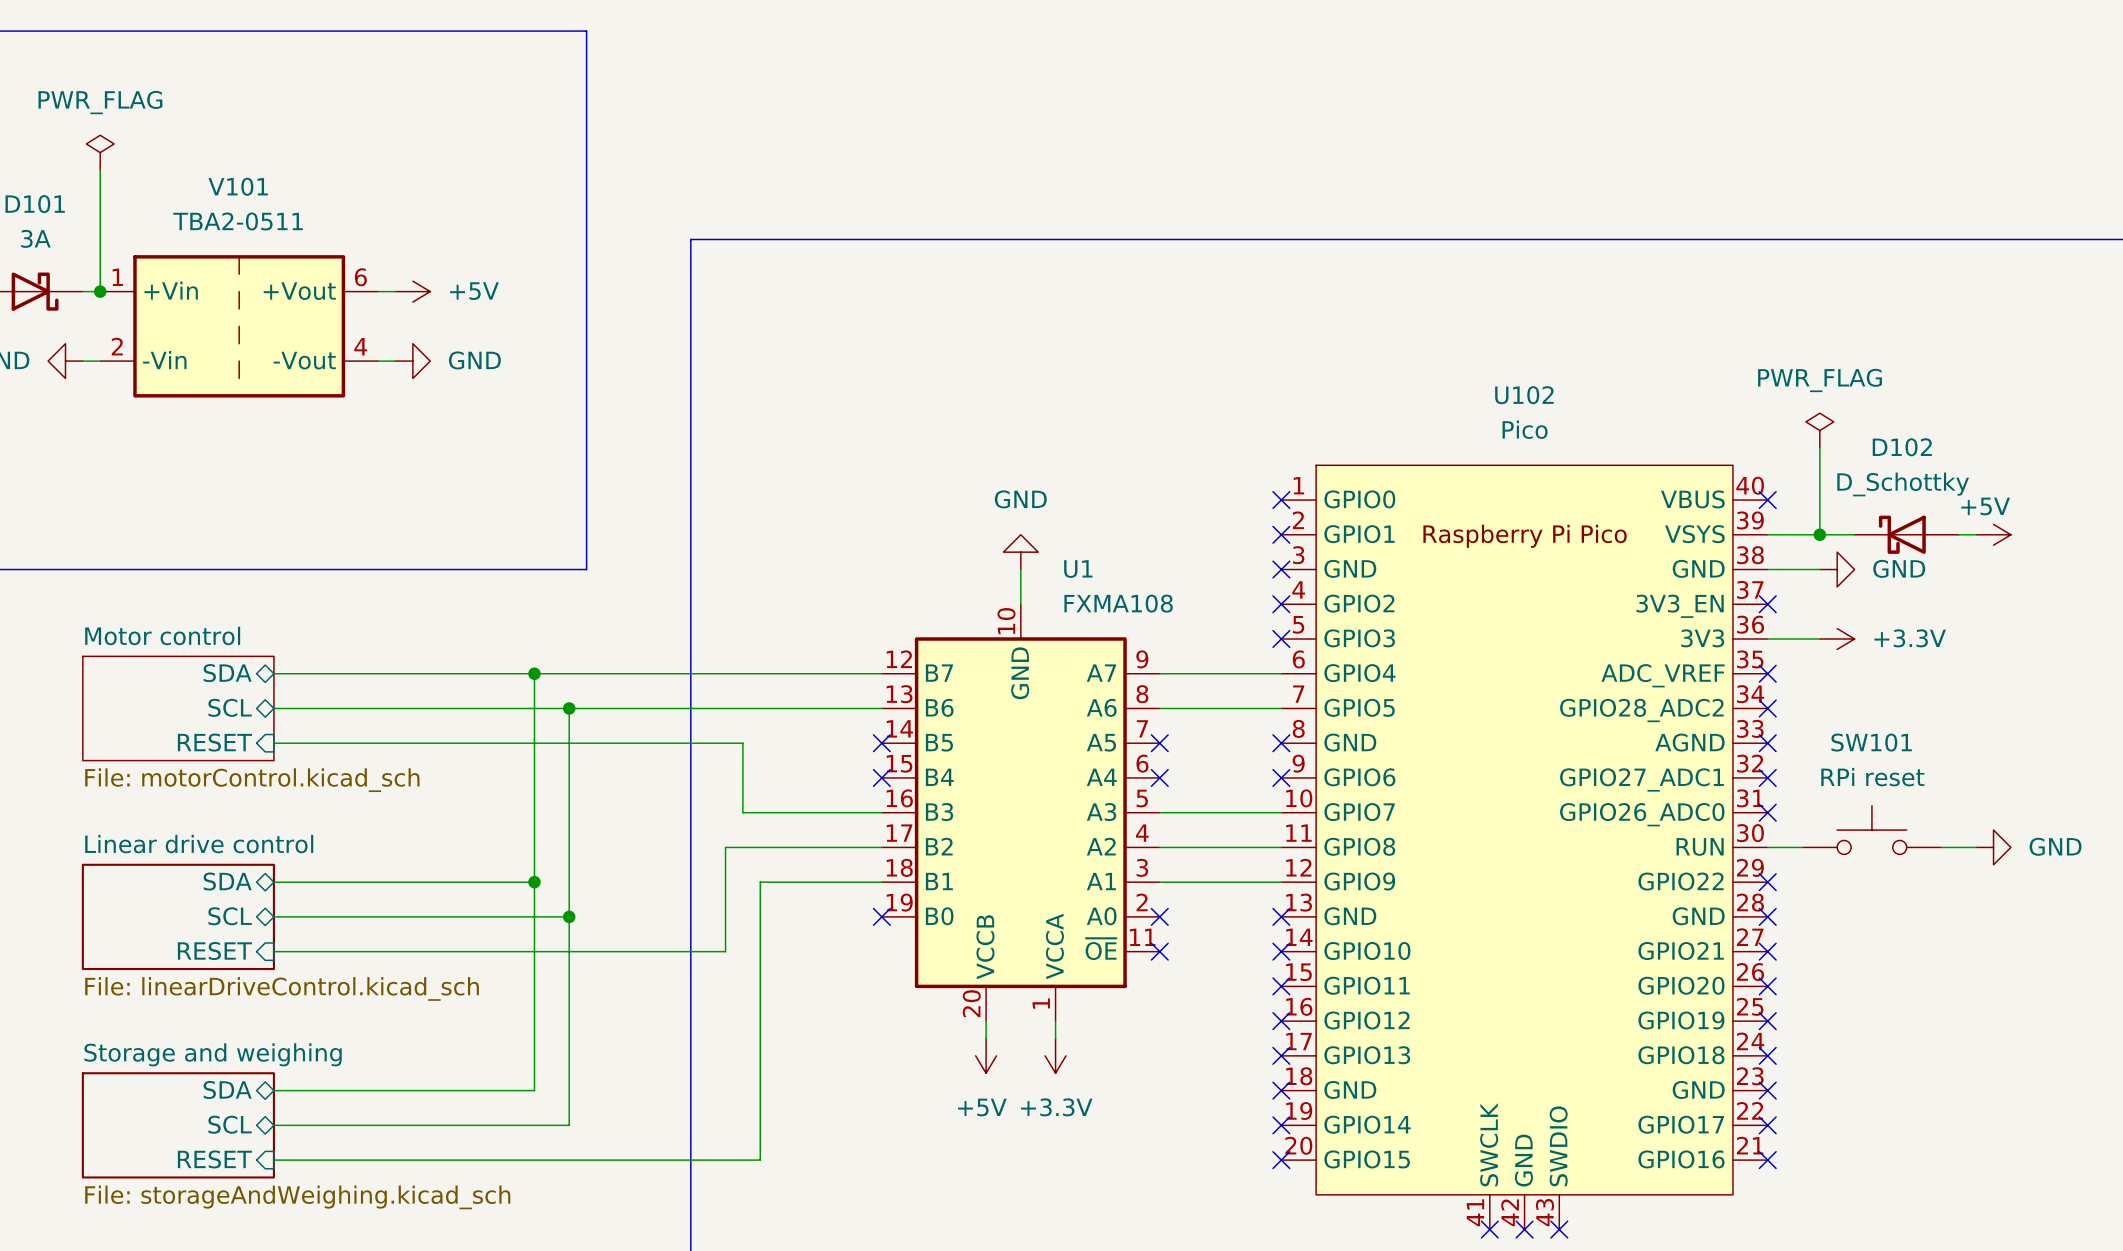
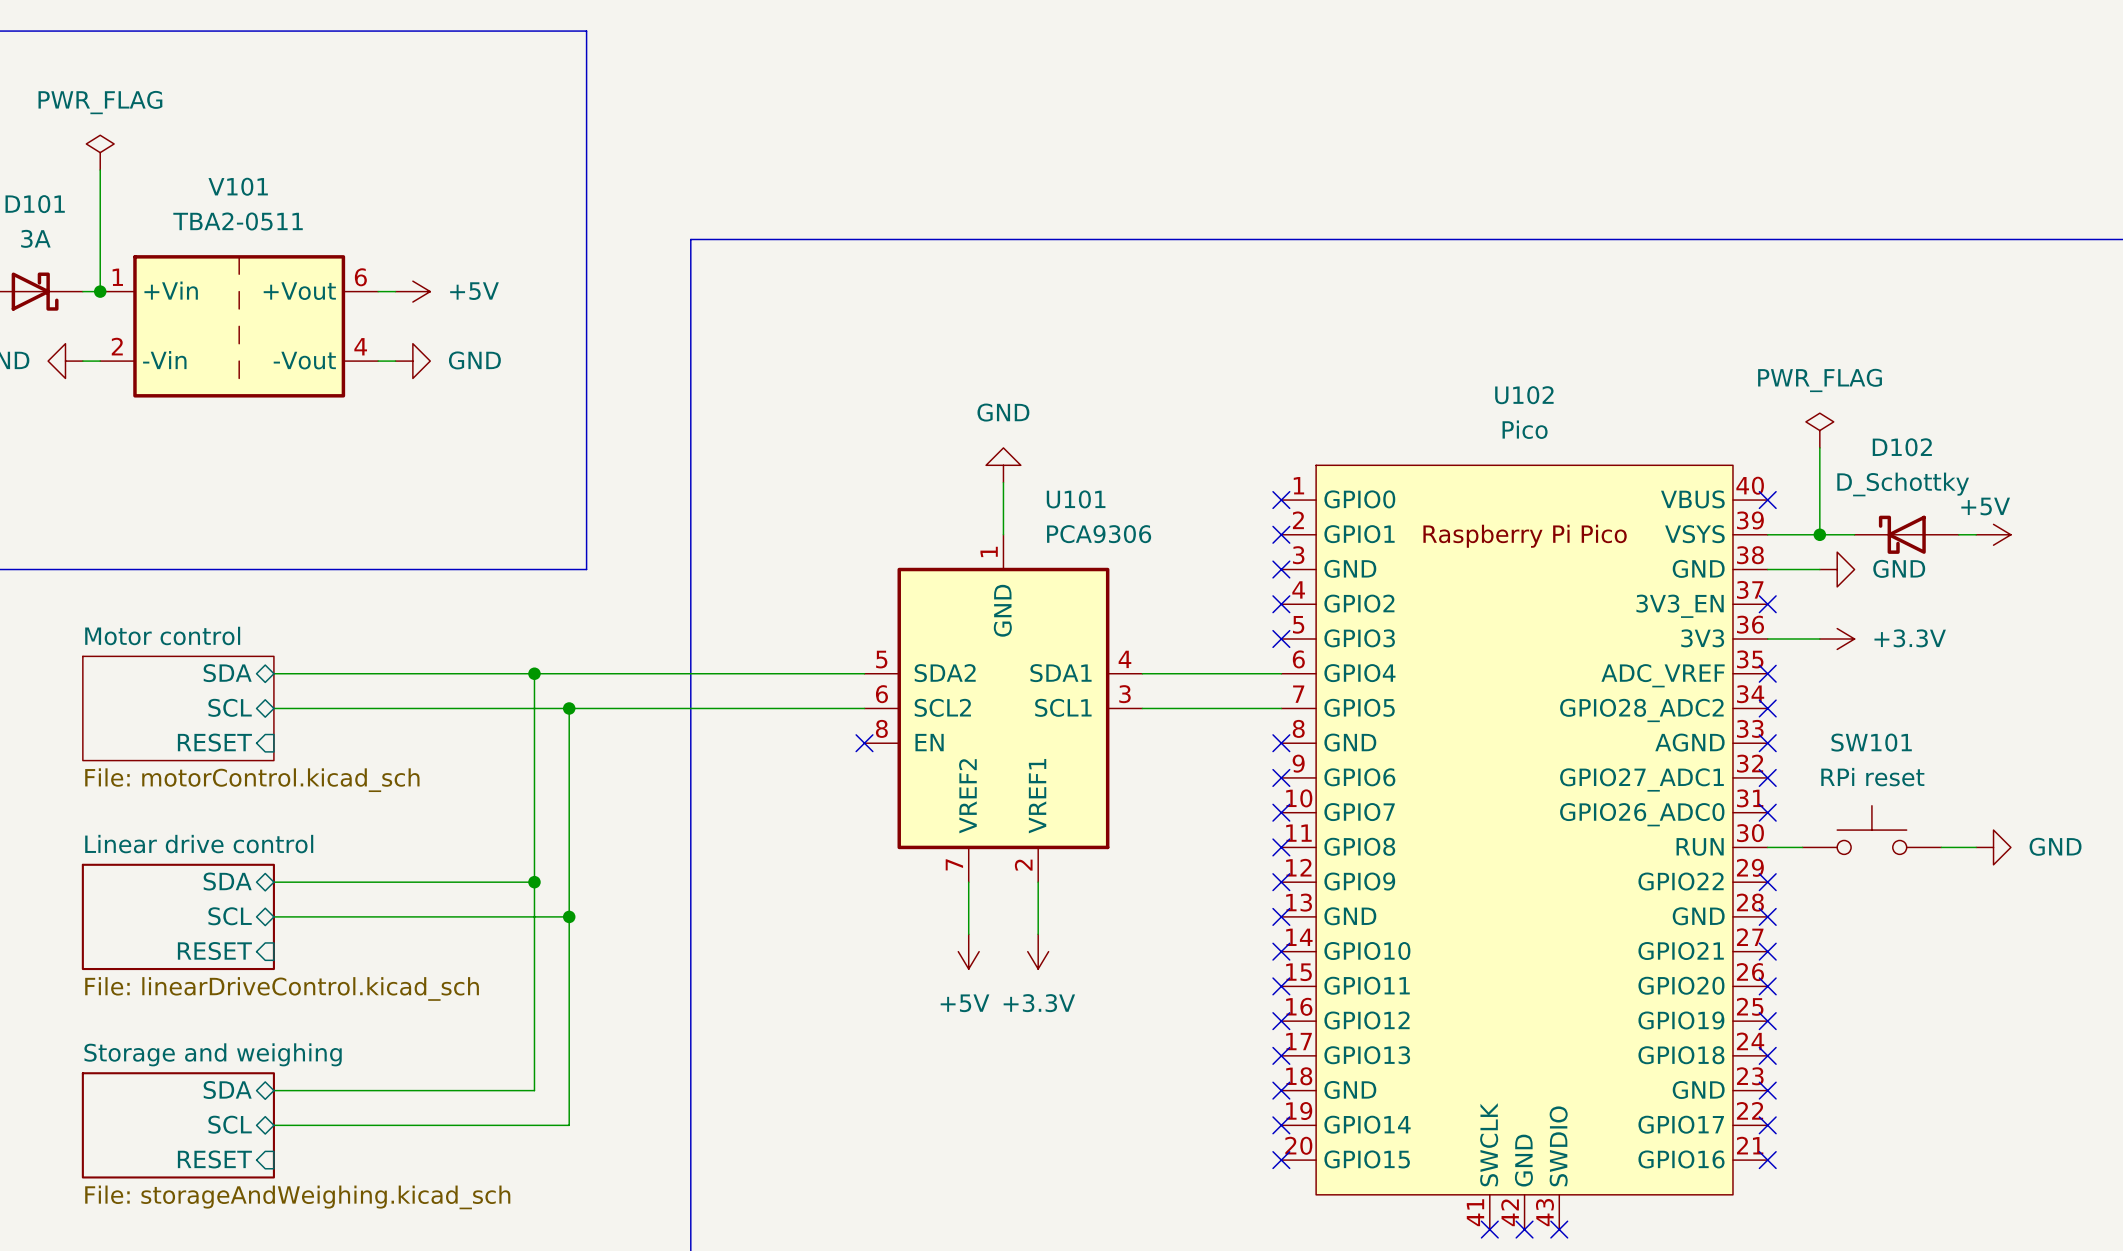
wire: none -> (1003, 482) (1003, 534)
power symbol position: GND (1020, 552) -> GND (1003, 465)
U101: none -> PCA9306 (1003, 708)
wire: (273, 743) (742, 743) (742, 812) (881, 812) -> none
no-connect mark position: (881, 743) -> (864, 743)
no-connect mark: (1159, 743) -> none
no-connect mark: (881, 777) -> none
no-connect mark: (1159, 777) -> none
U1: FXMA108 (1020, 812) -> none
wire: (1159, 812) (1281, 812) -> none
no-connect mark: none -> (1281, 812)
wire: (881, 847) (725, 847) (725, 951) (273, 951) -> none
wire: (1159, 847) (1281, 847) -> none
no-connect mark: none -> (1281, 847)
wire: (881, 882) (760, 882) (760, 1160) (273, 1160) -> none
wire: (1159, 882) (1281, 882) -> none
no-connect mark: none -> (1281, 882)
no-connect mark: (881, 916) -> none
no-connect mark: (1159, 916) -> none
no-connect mark: (1159, 951) -> none
wire: (986, 1021) (986, 1038) -> none
wire: (1055, 1021) (1055, 1038) -> none
power symbol position: +5V (986, 1055) -> +5V (968, 951)
power symbol position: +3.3V (1055, 1055) -> +3.3V (1038, 951)

